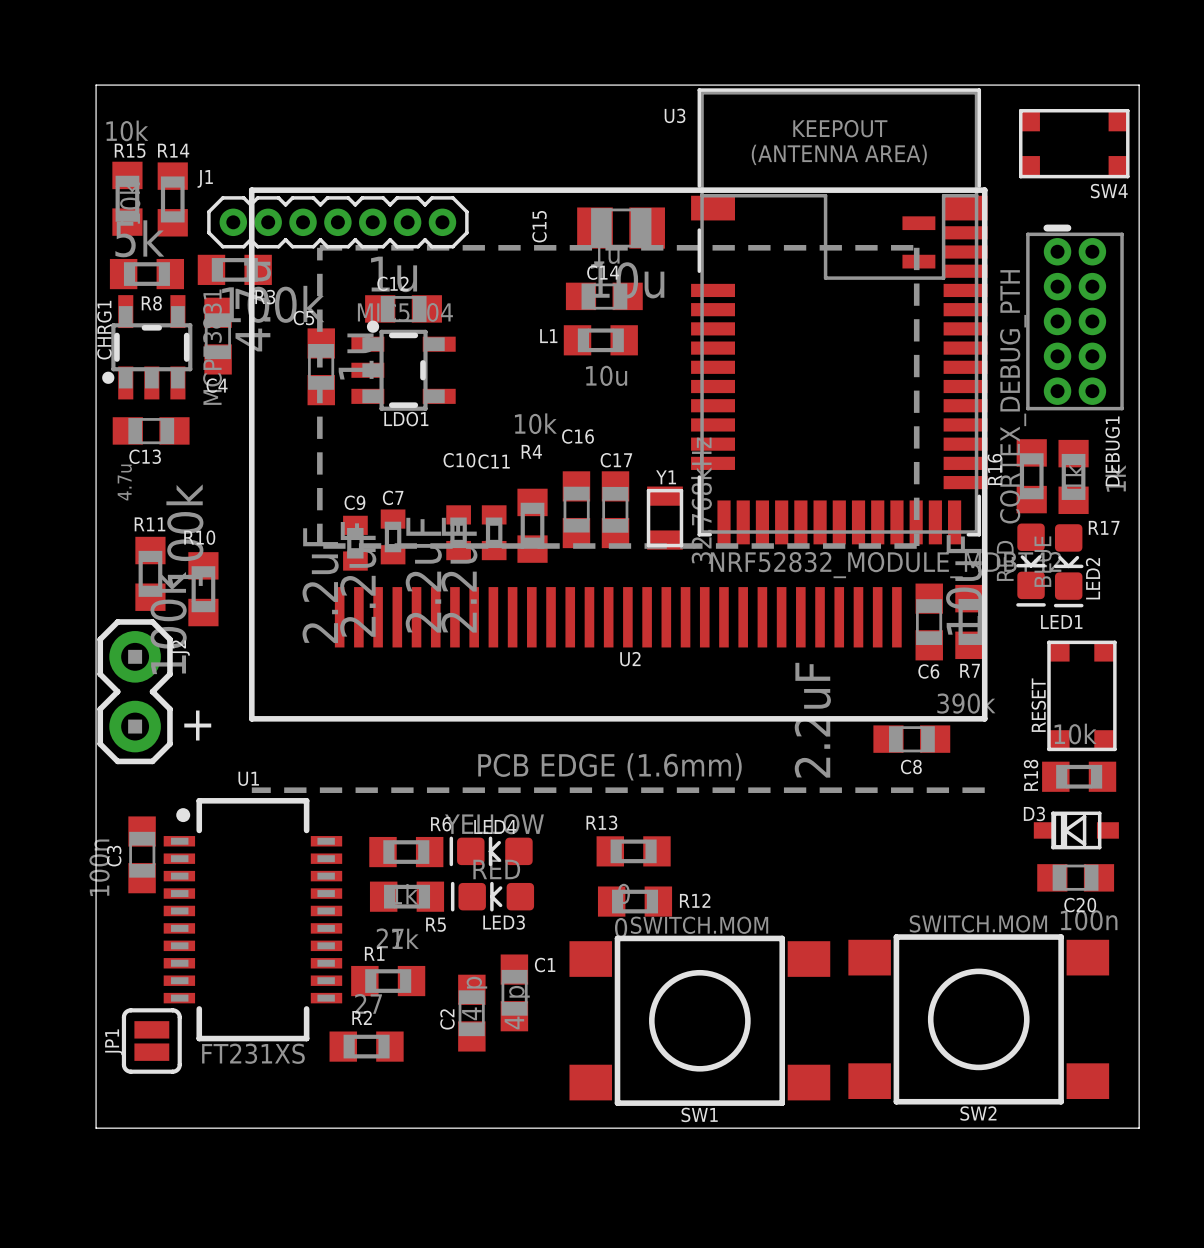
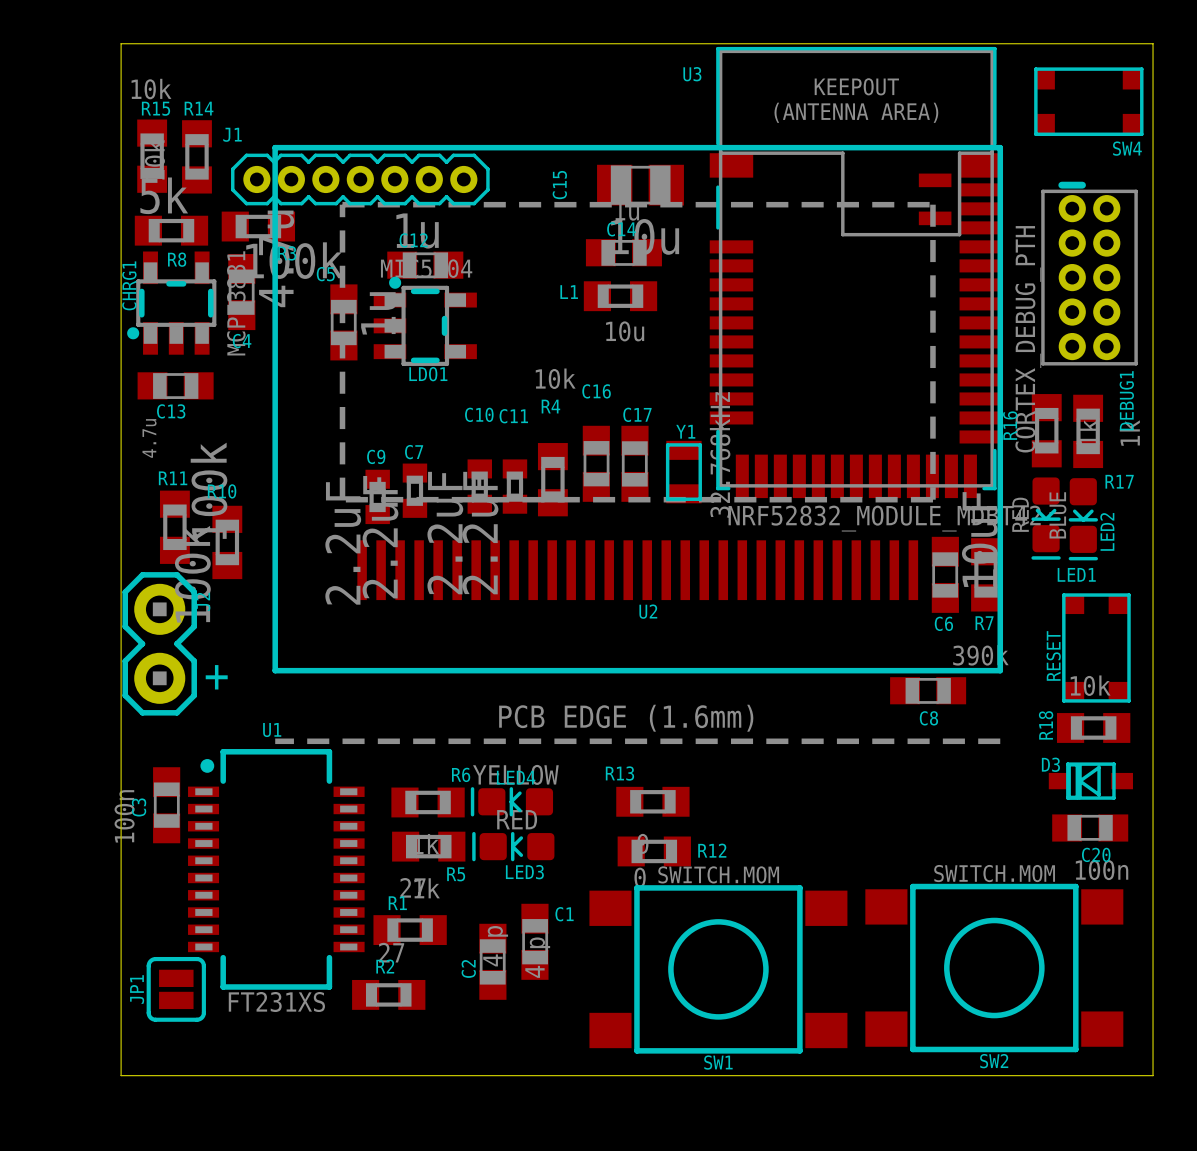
C8 value: 2.2uF (812, 720) -> none

